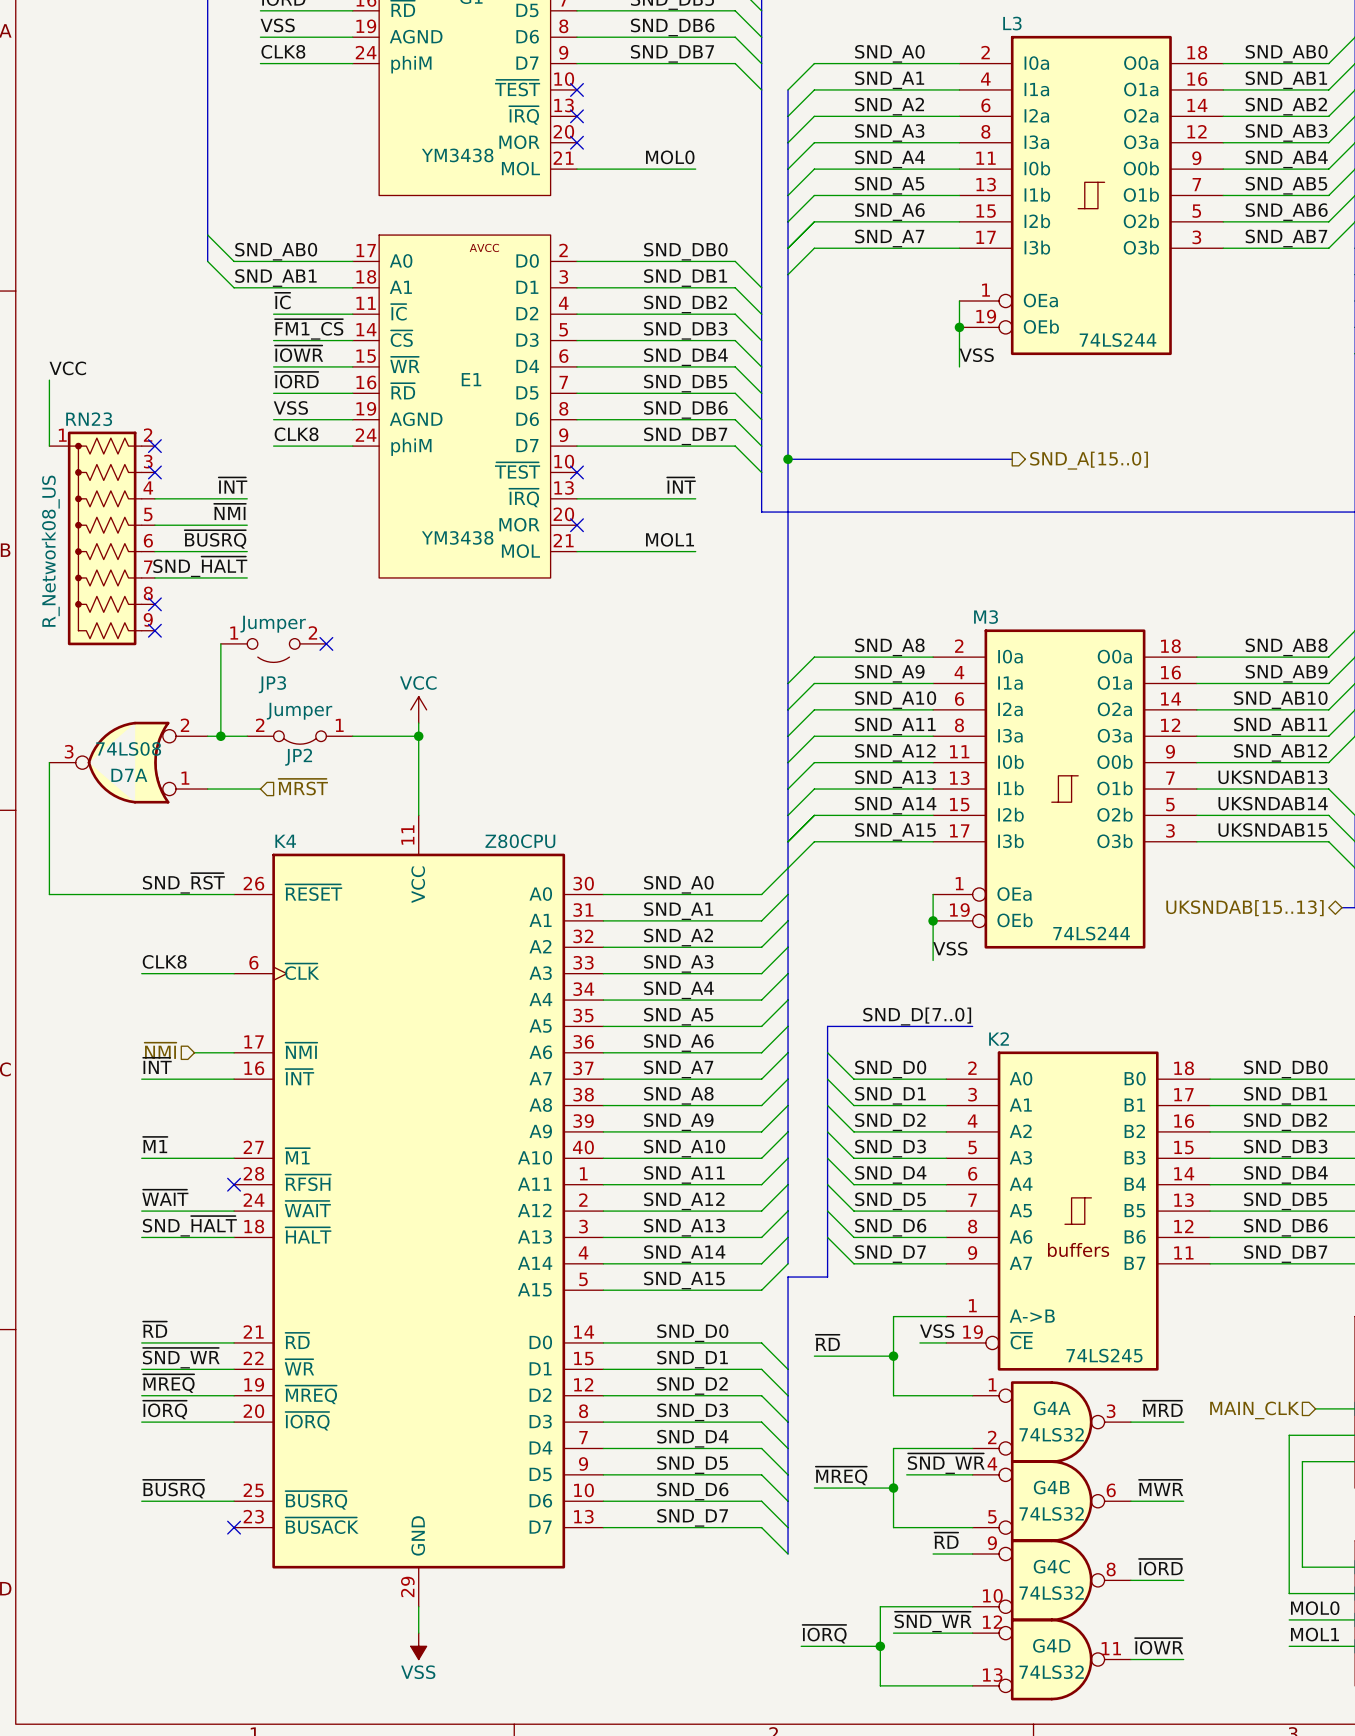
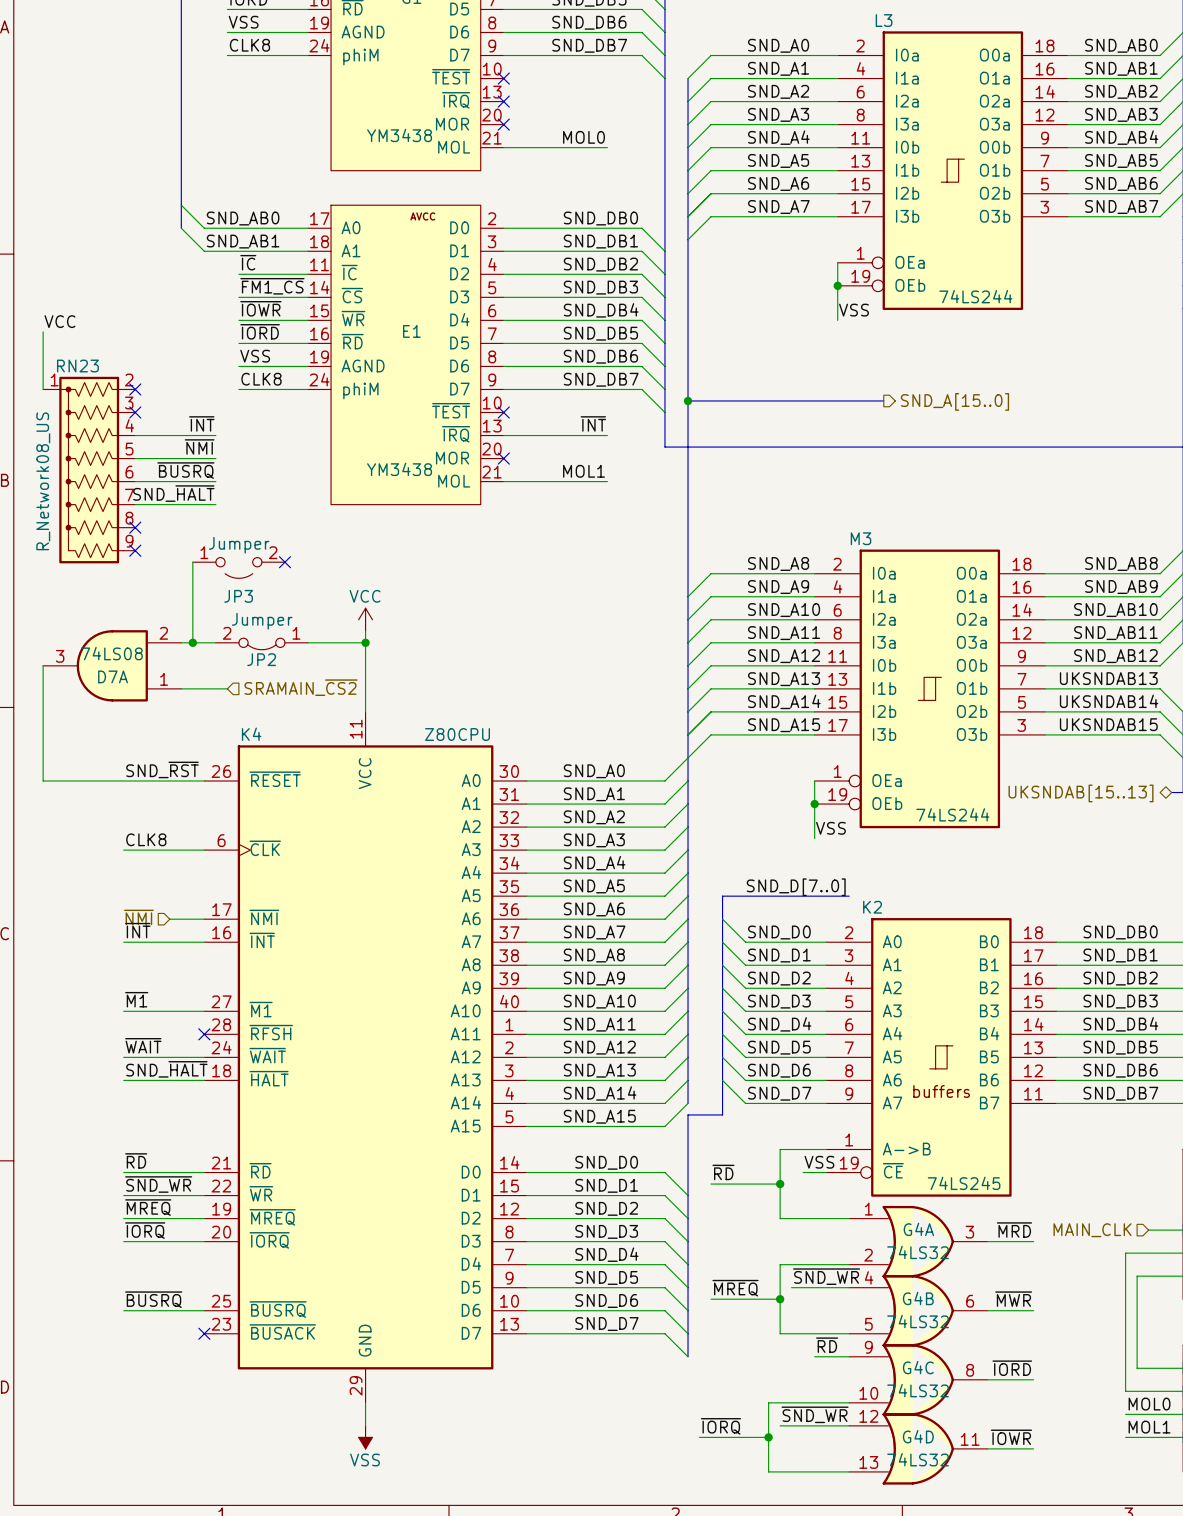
D7A symbol: [49, 721, 208, 804] -> [43, 630, 182, 702]
hierarchical label: ~{MRST} (303, 787) -> SRAMAIN_~{CS2} (301, 687)
G4A symbol: [972, 1381, 1131, 1463] -> [849, 1205, 988, 1278]
G4B symbol: [972, 1460, 1131, 1543] -> [849, 1275, 988, 1347]
G4C symbol: [972, 1539, 1131, 1622] -> [849, 1344, 988, 1416]
G4D symbol: [972, 1618, 1131, 1701] -> [849, 1413, 988, 1485]

